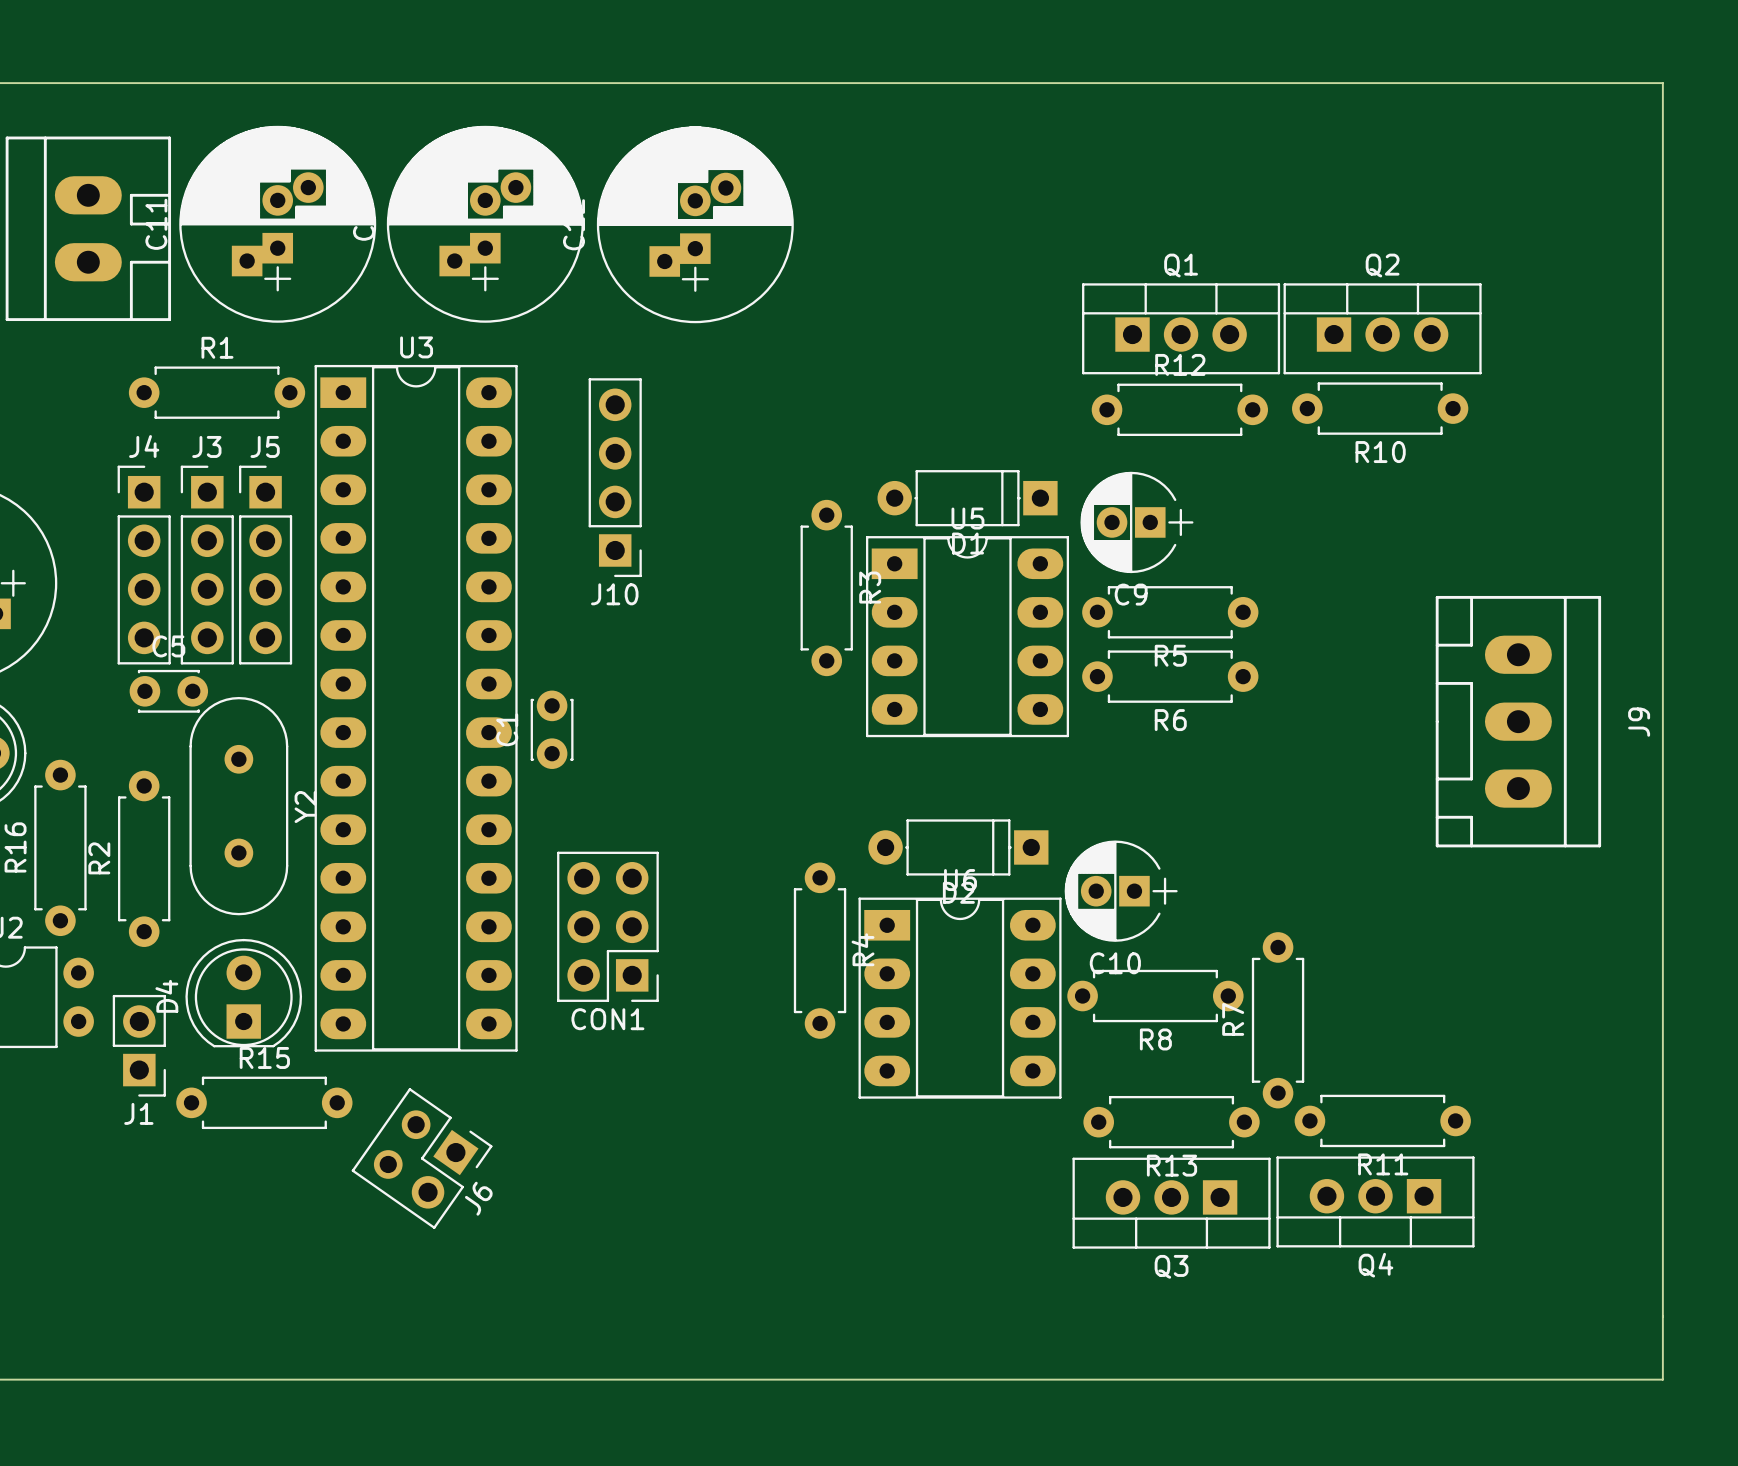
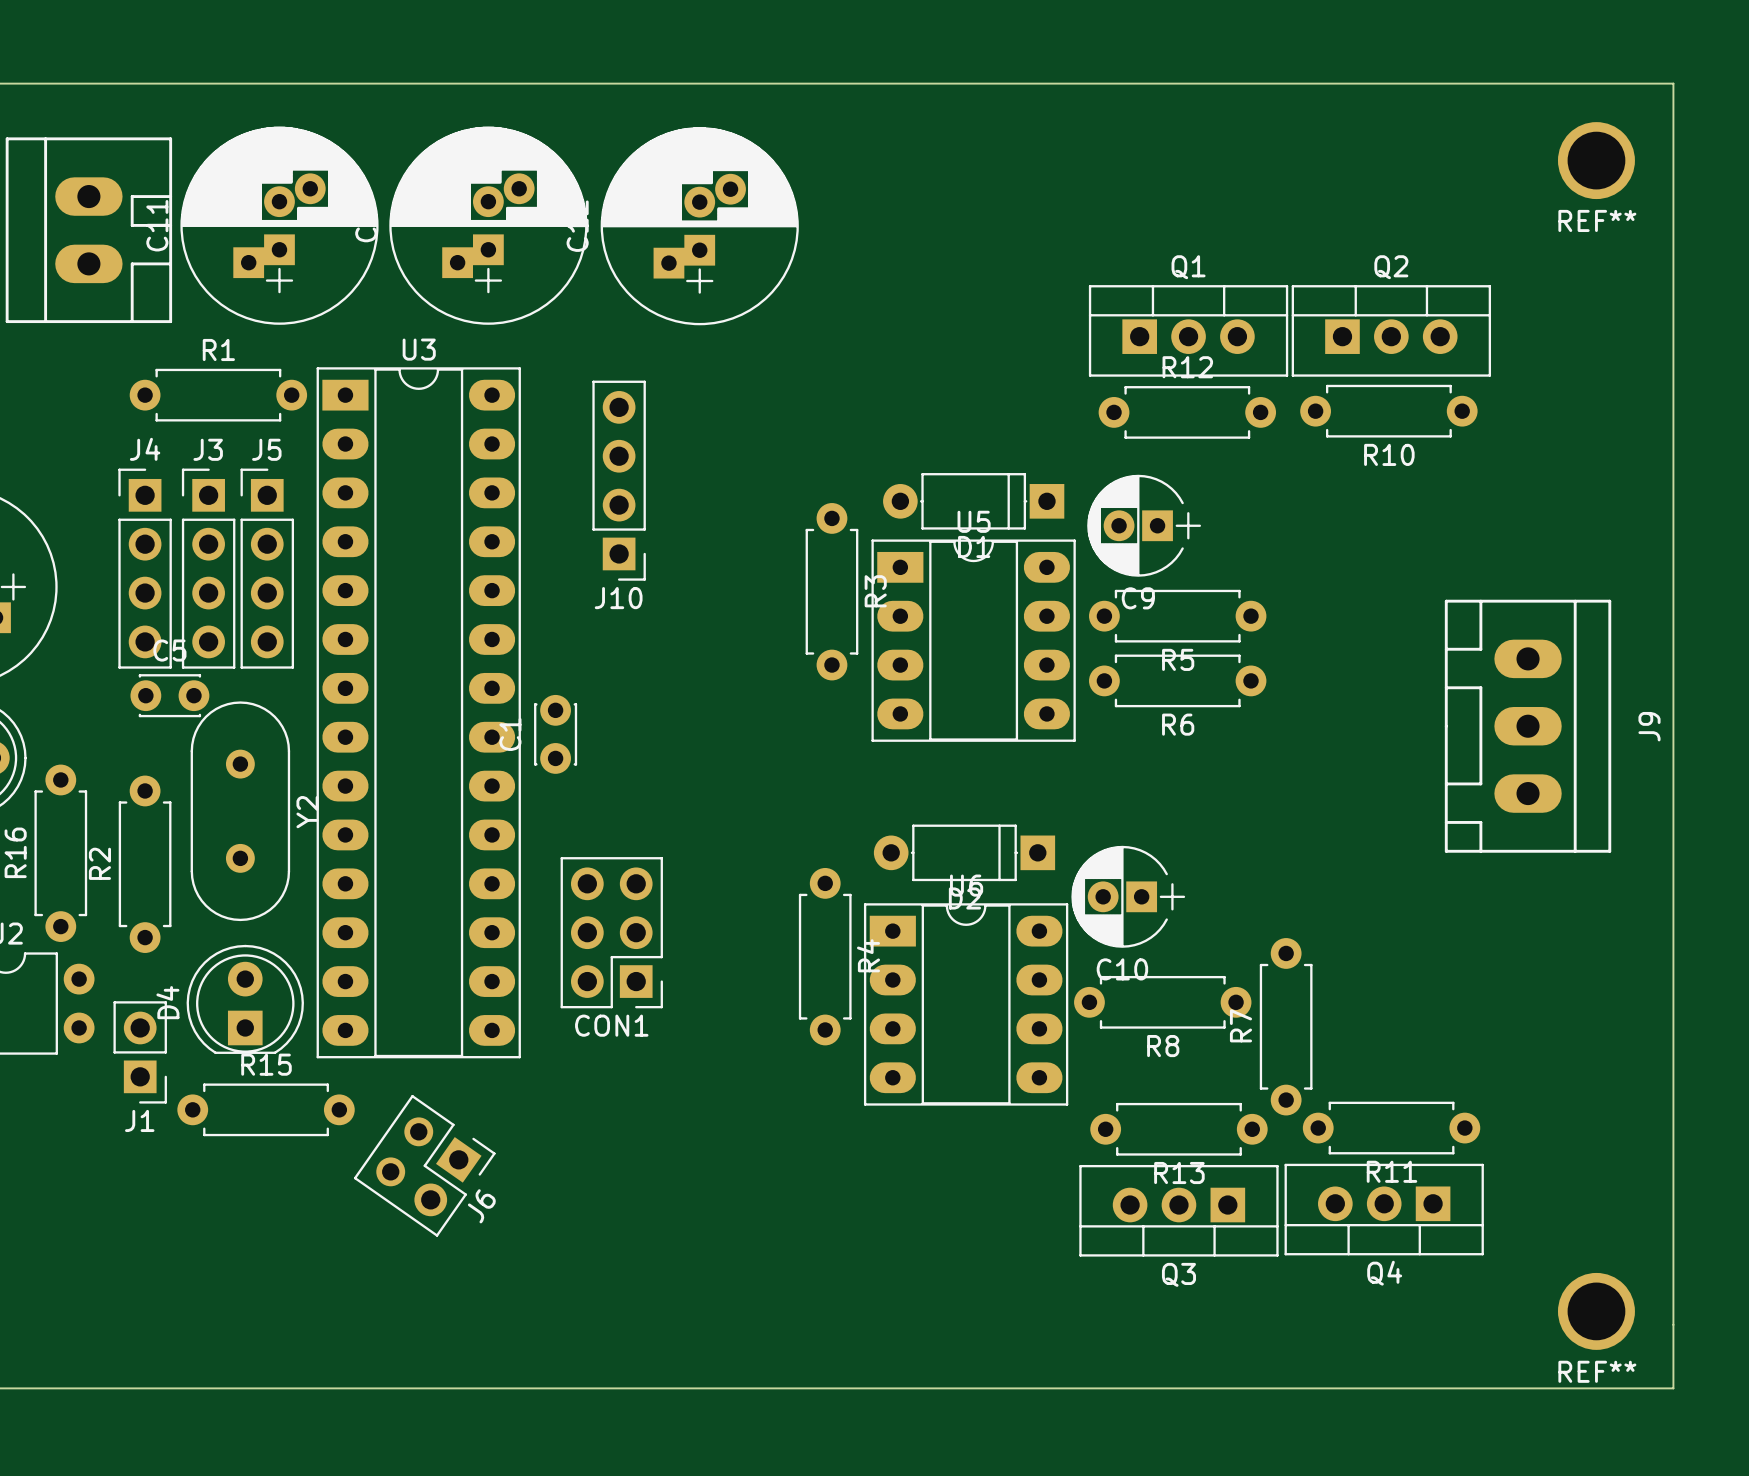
REF**: none -> (1596, 160)
REF**: none -> (1596, 1311)

